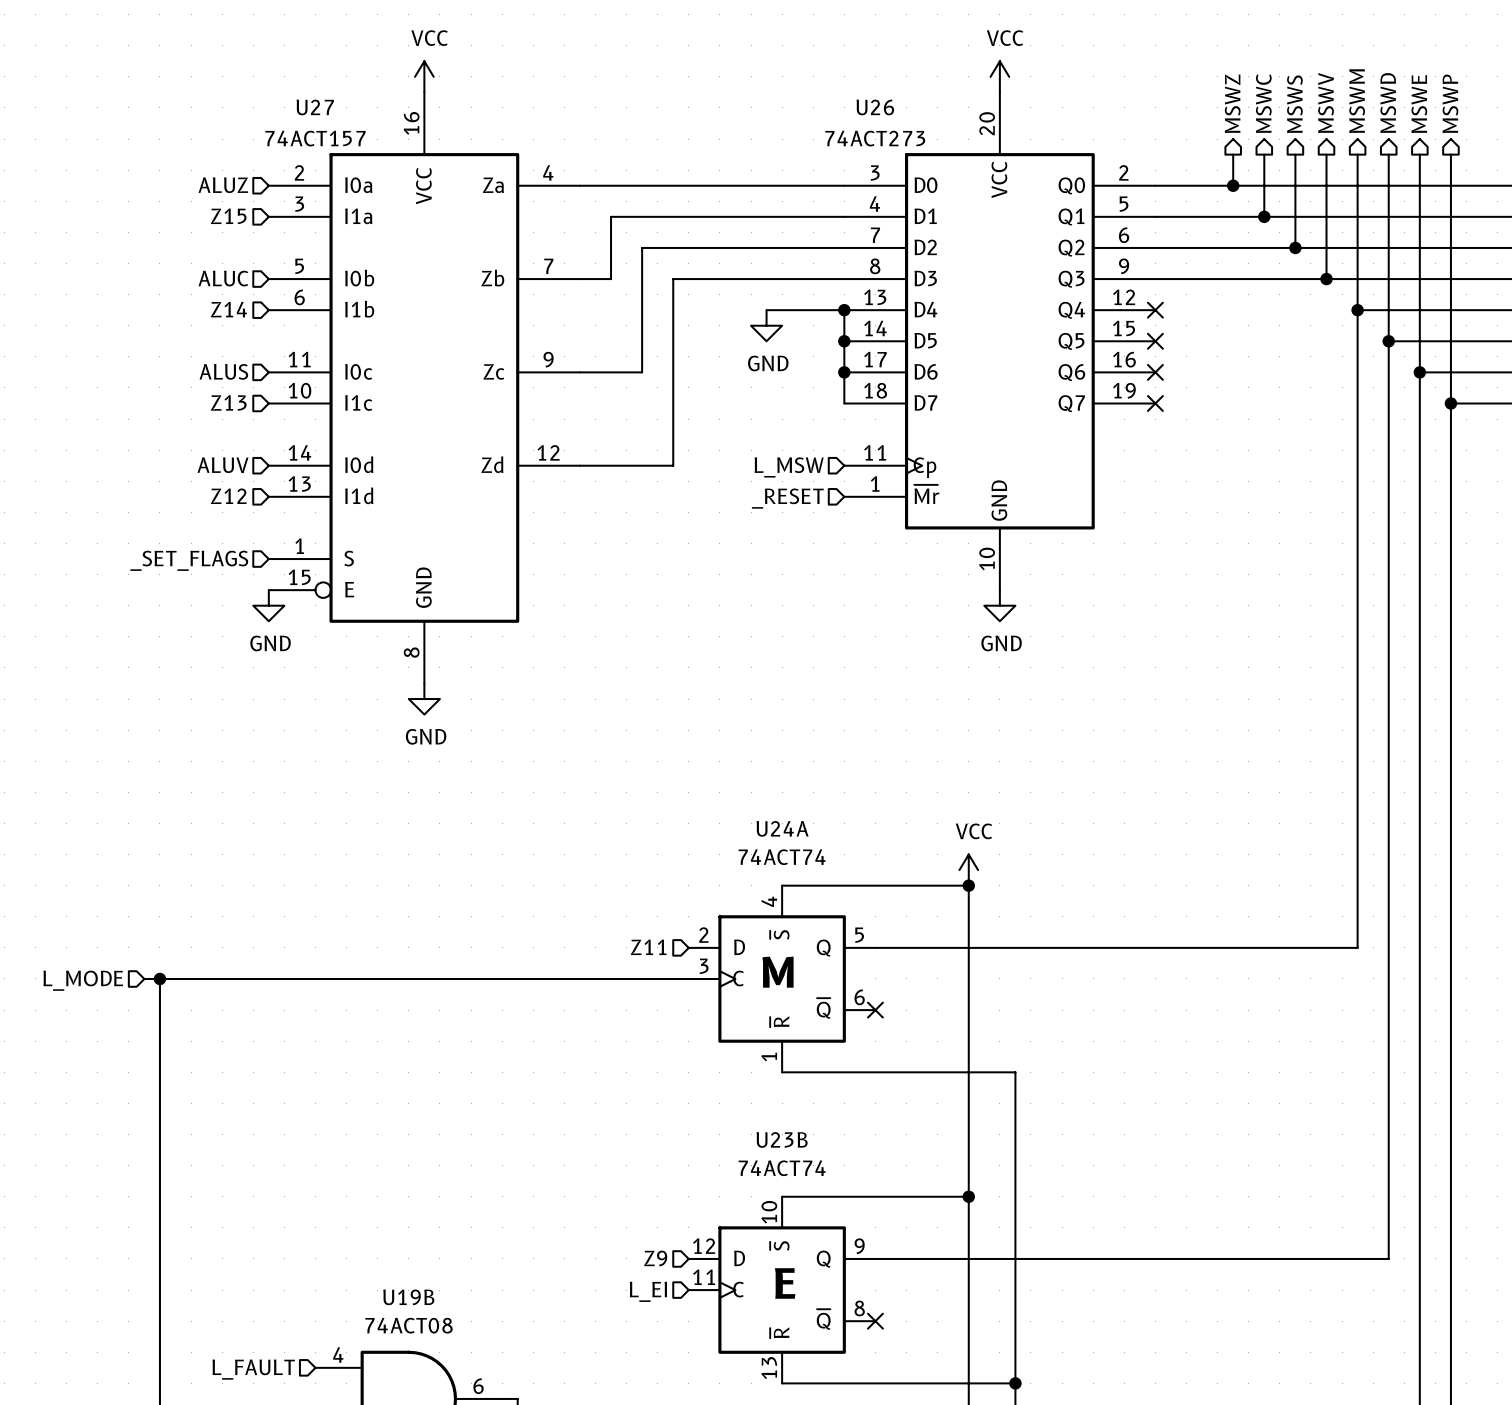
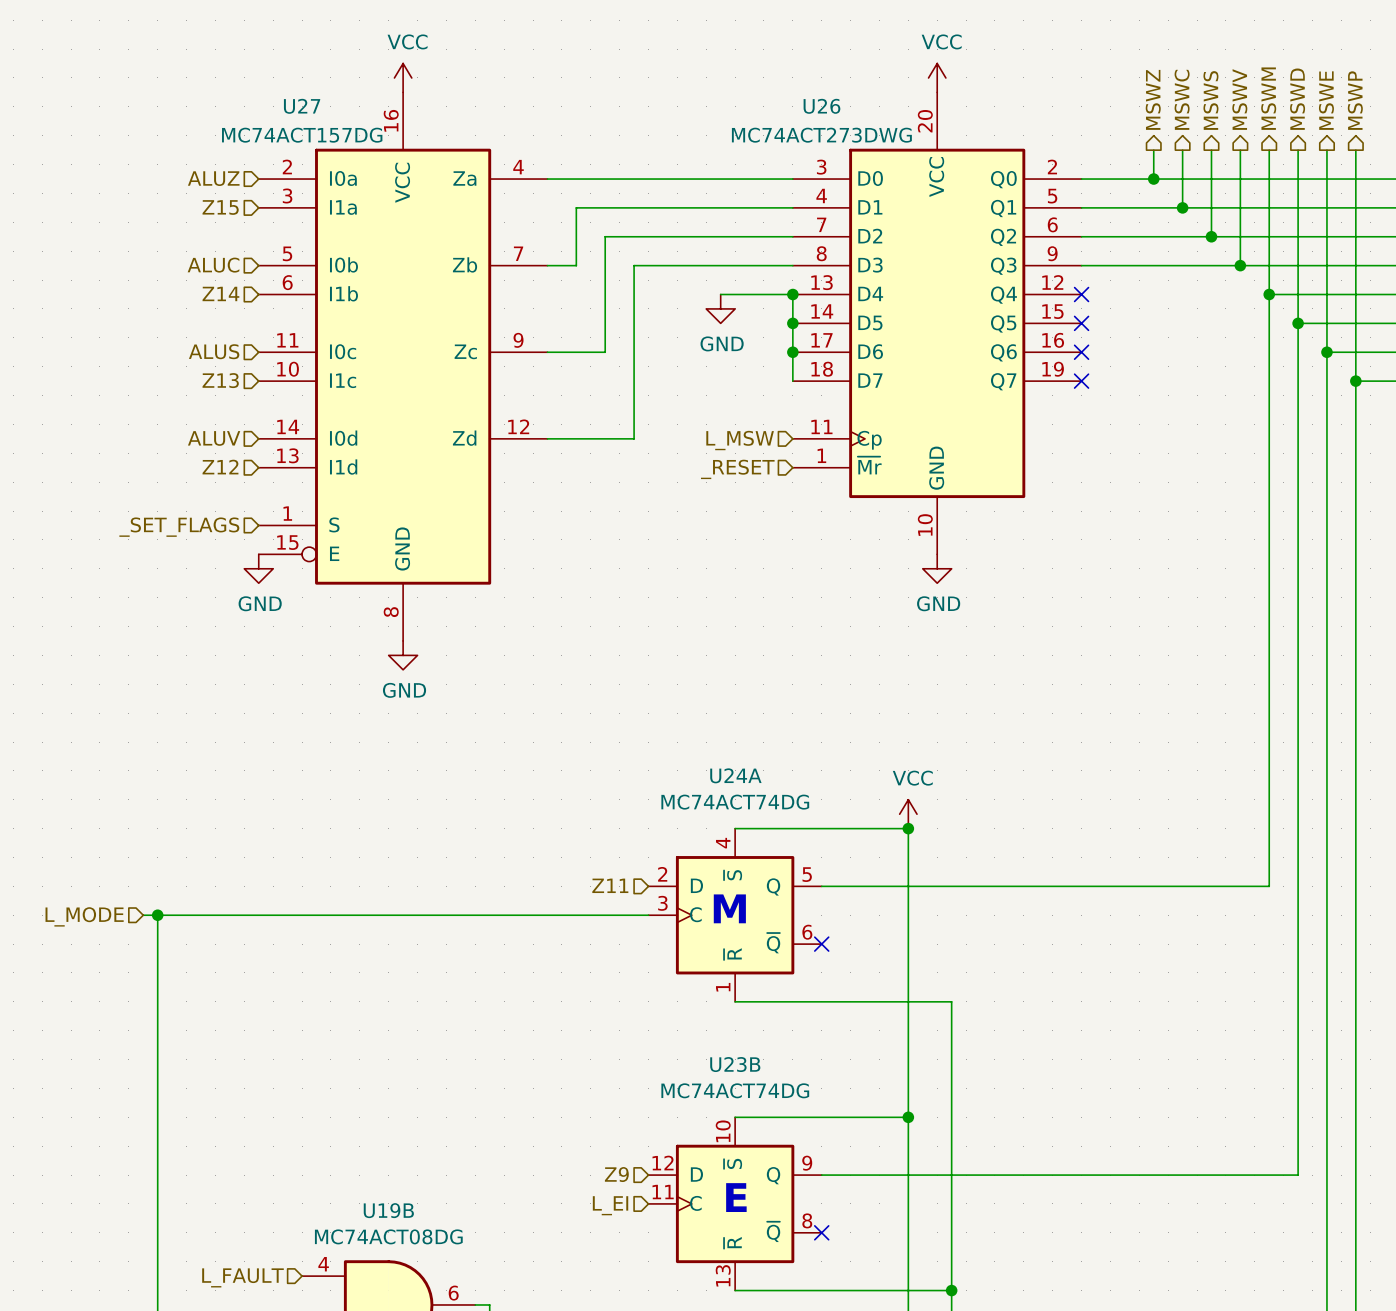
U27 value: 74ACT157 (315, 138) -> MC74ACT157DG (302, 135)
U26 value: 74ACT273 (875, 138) -> MC74ACT273DWG (821, 135)
U24A value: 74ACT74 (782, 857) -> MC74ACT74DG (735, 802)
U23B value: 74ACT74 (782, 1168) -> MC74ACT74DG (735, 1090)
U19B value: 74ACT08 (408, 1325) -> MC74ACT08DG (388, 1236)

